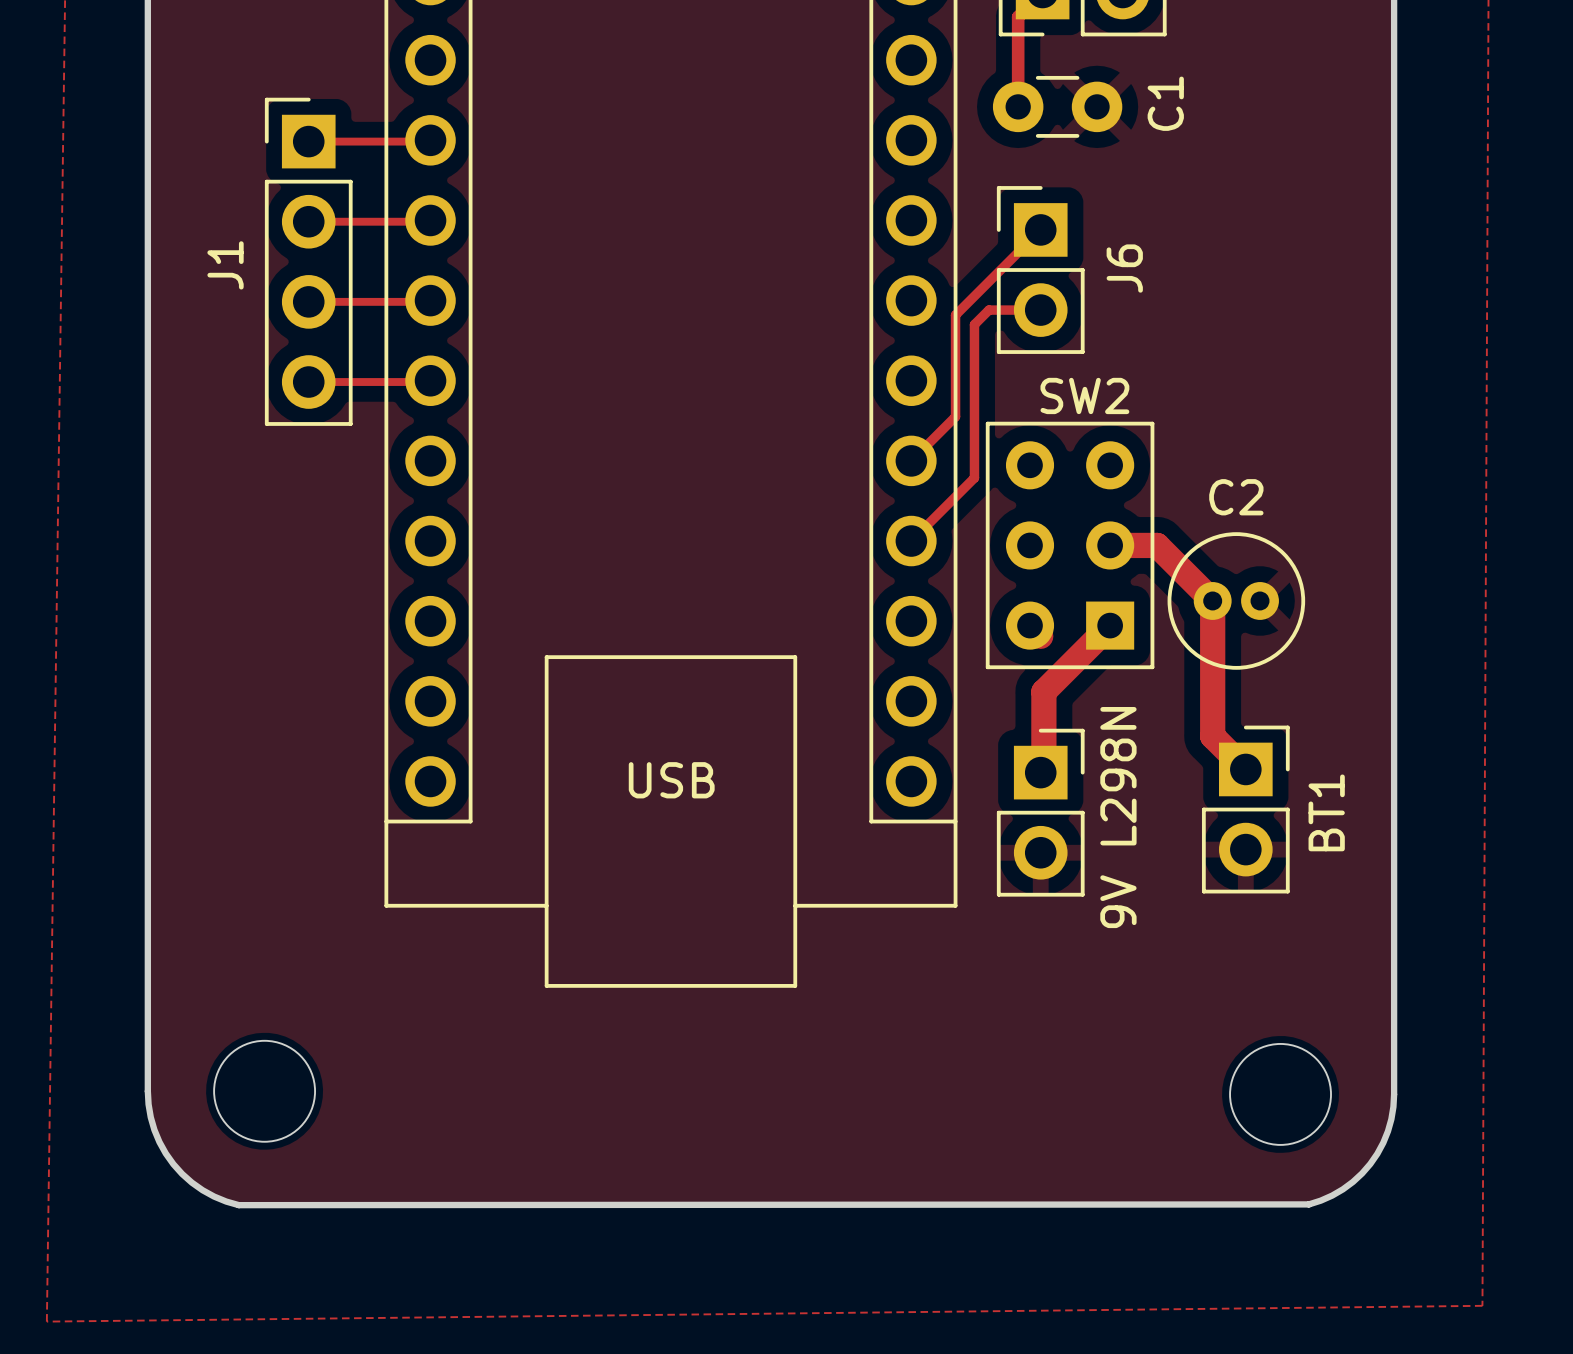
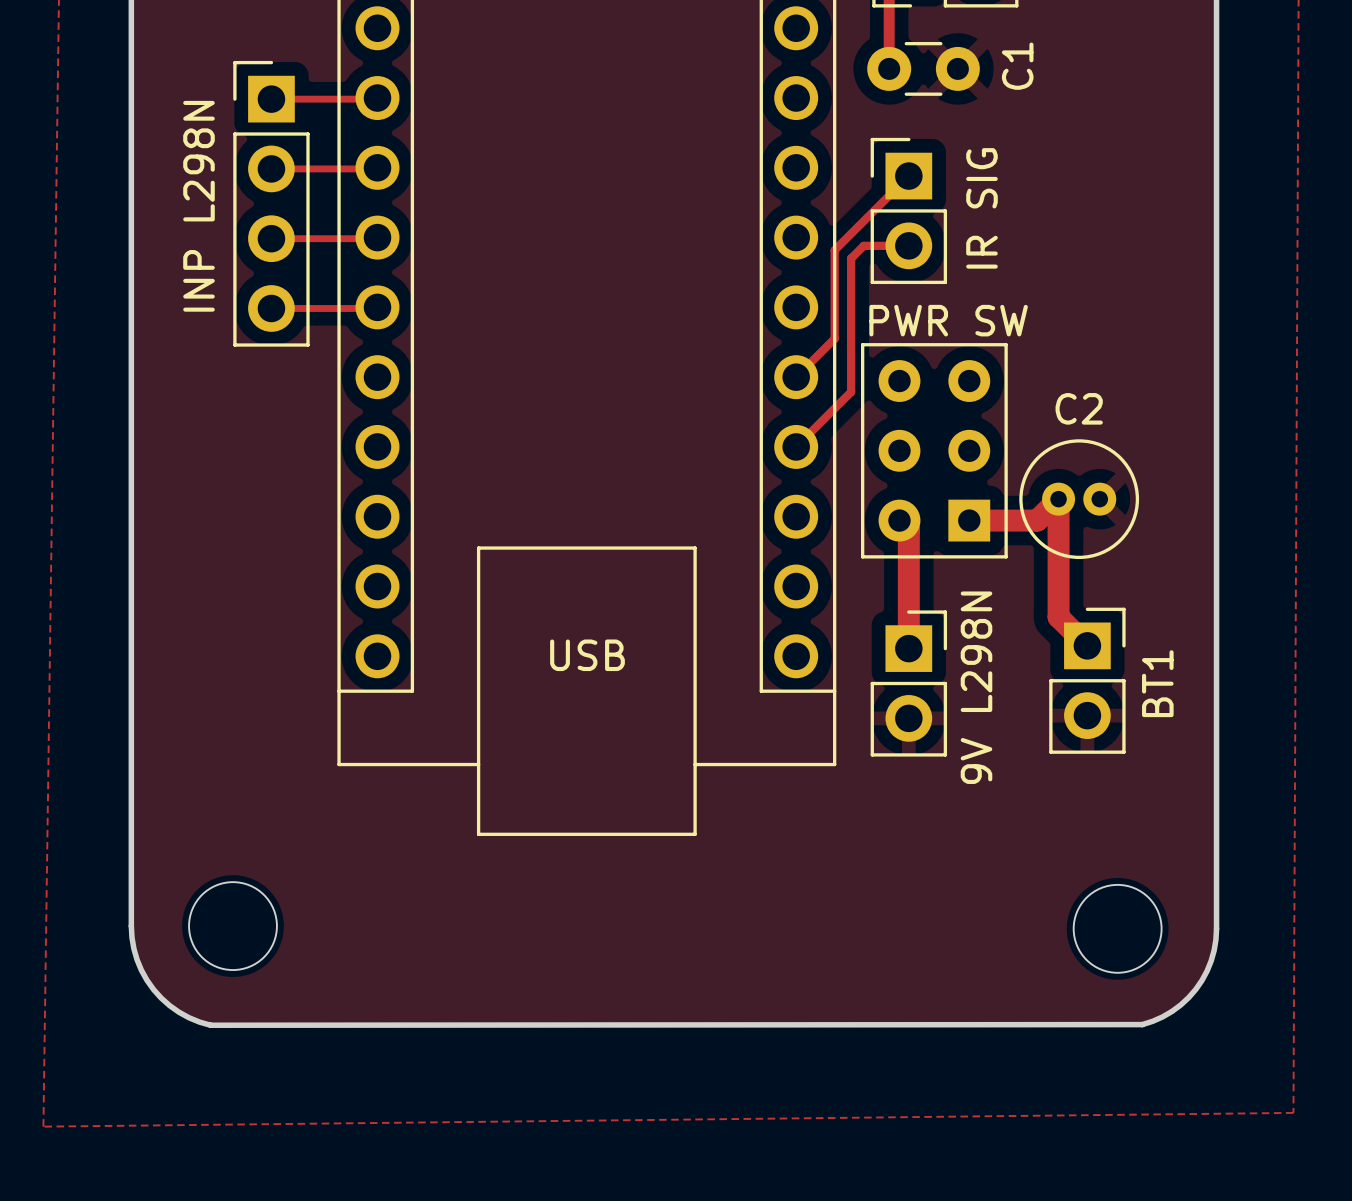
J1 name: J1 (225, 265) -> INP L298N (198, 206)
J6 name: J6 (1124, 268) -> IR SIG (981, 208)
SW2 name: SW2 (1084, 395) -> PWR SW (948, 320)
track: (1110, 545) (1157, 545) (1212, 600) -> (969, 520) (1037, 520) (1058, 499)
track: (1110, 625) (1043, 691) (1043, 769) (1040, 772) -> (908, 529) (908, 648)

